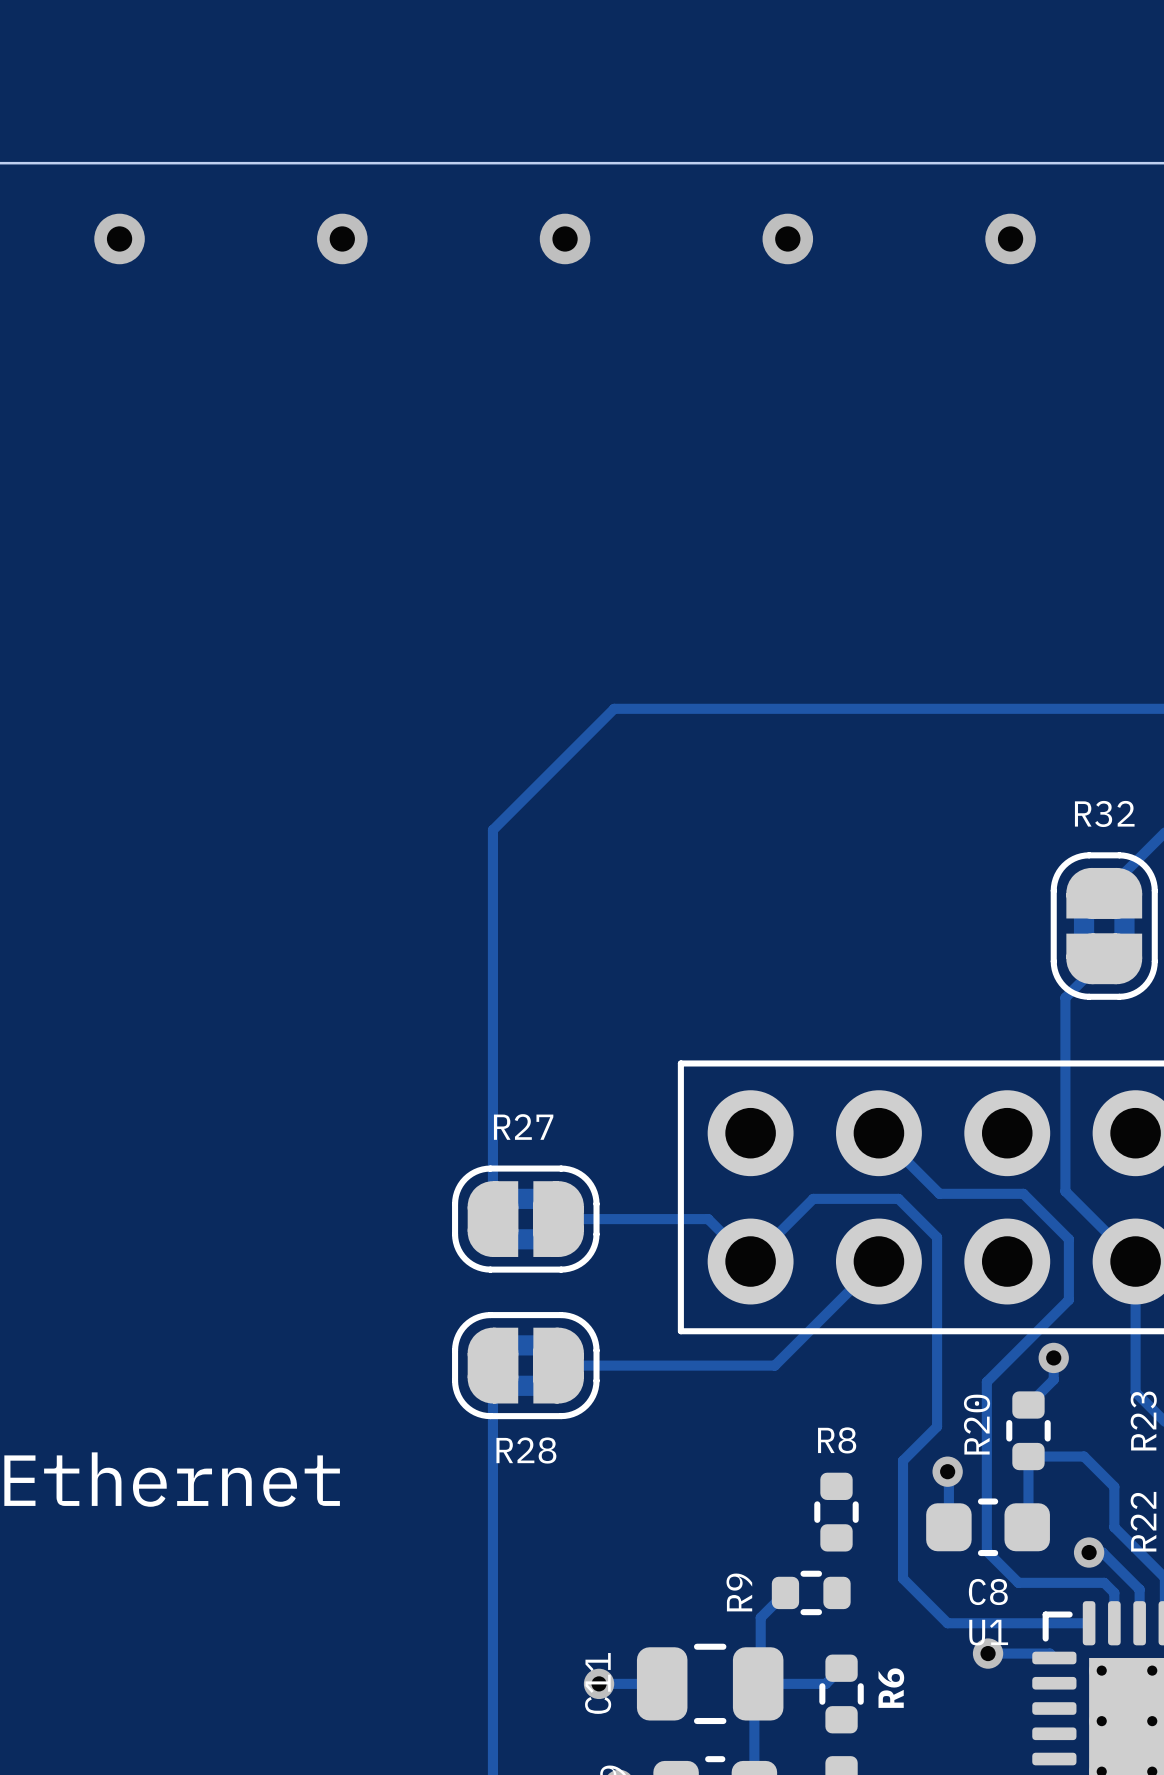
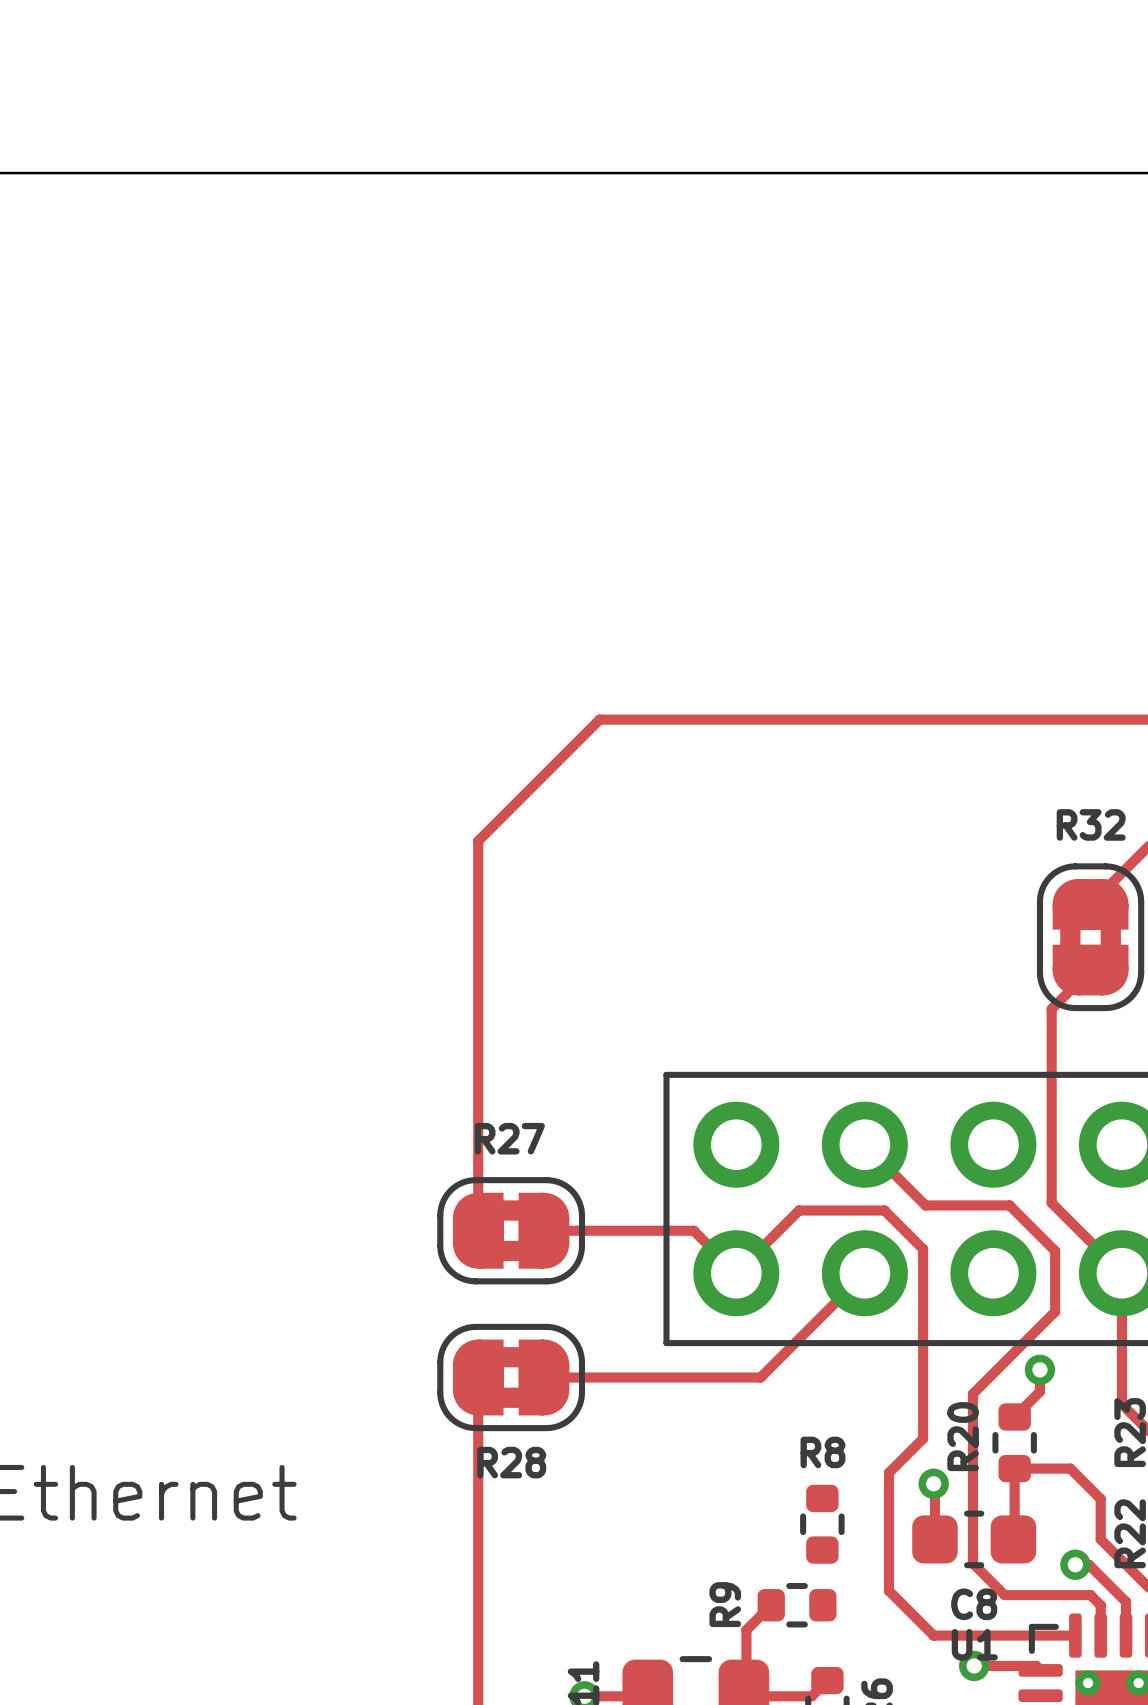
via: (119, 238) -> none
via: (342, 238) -> none
via: (565, 238) -> none
via: (787, 238) -> none
via: (1010, 238) -> none

